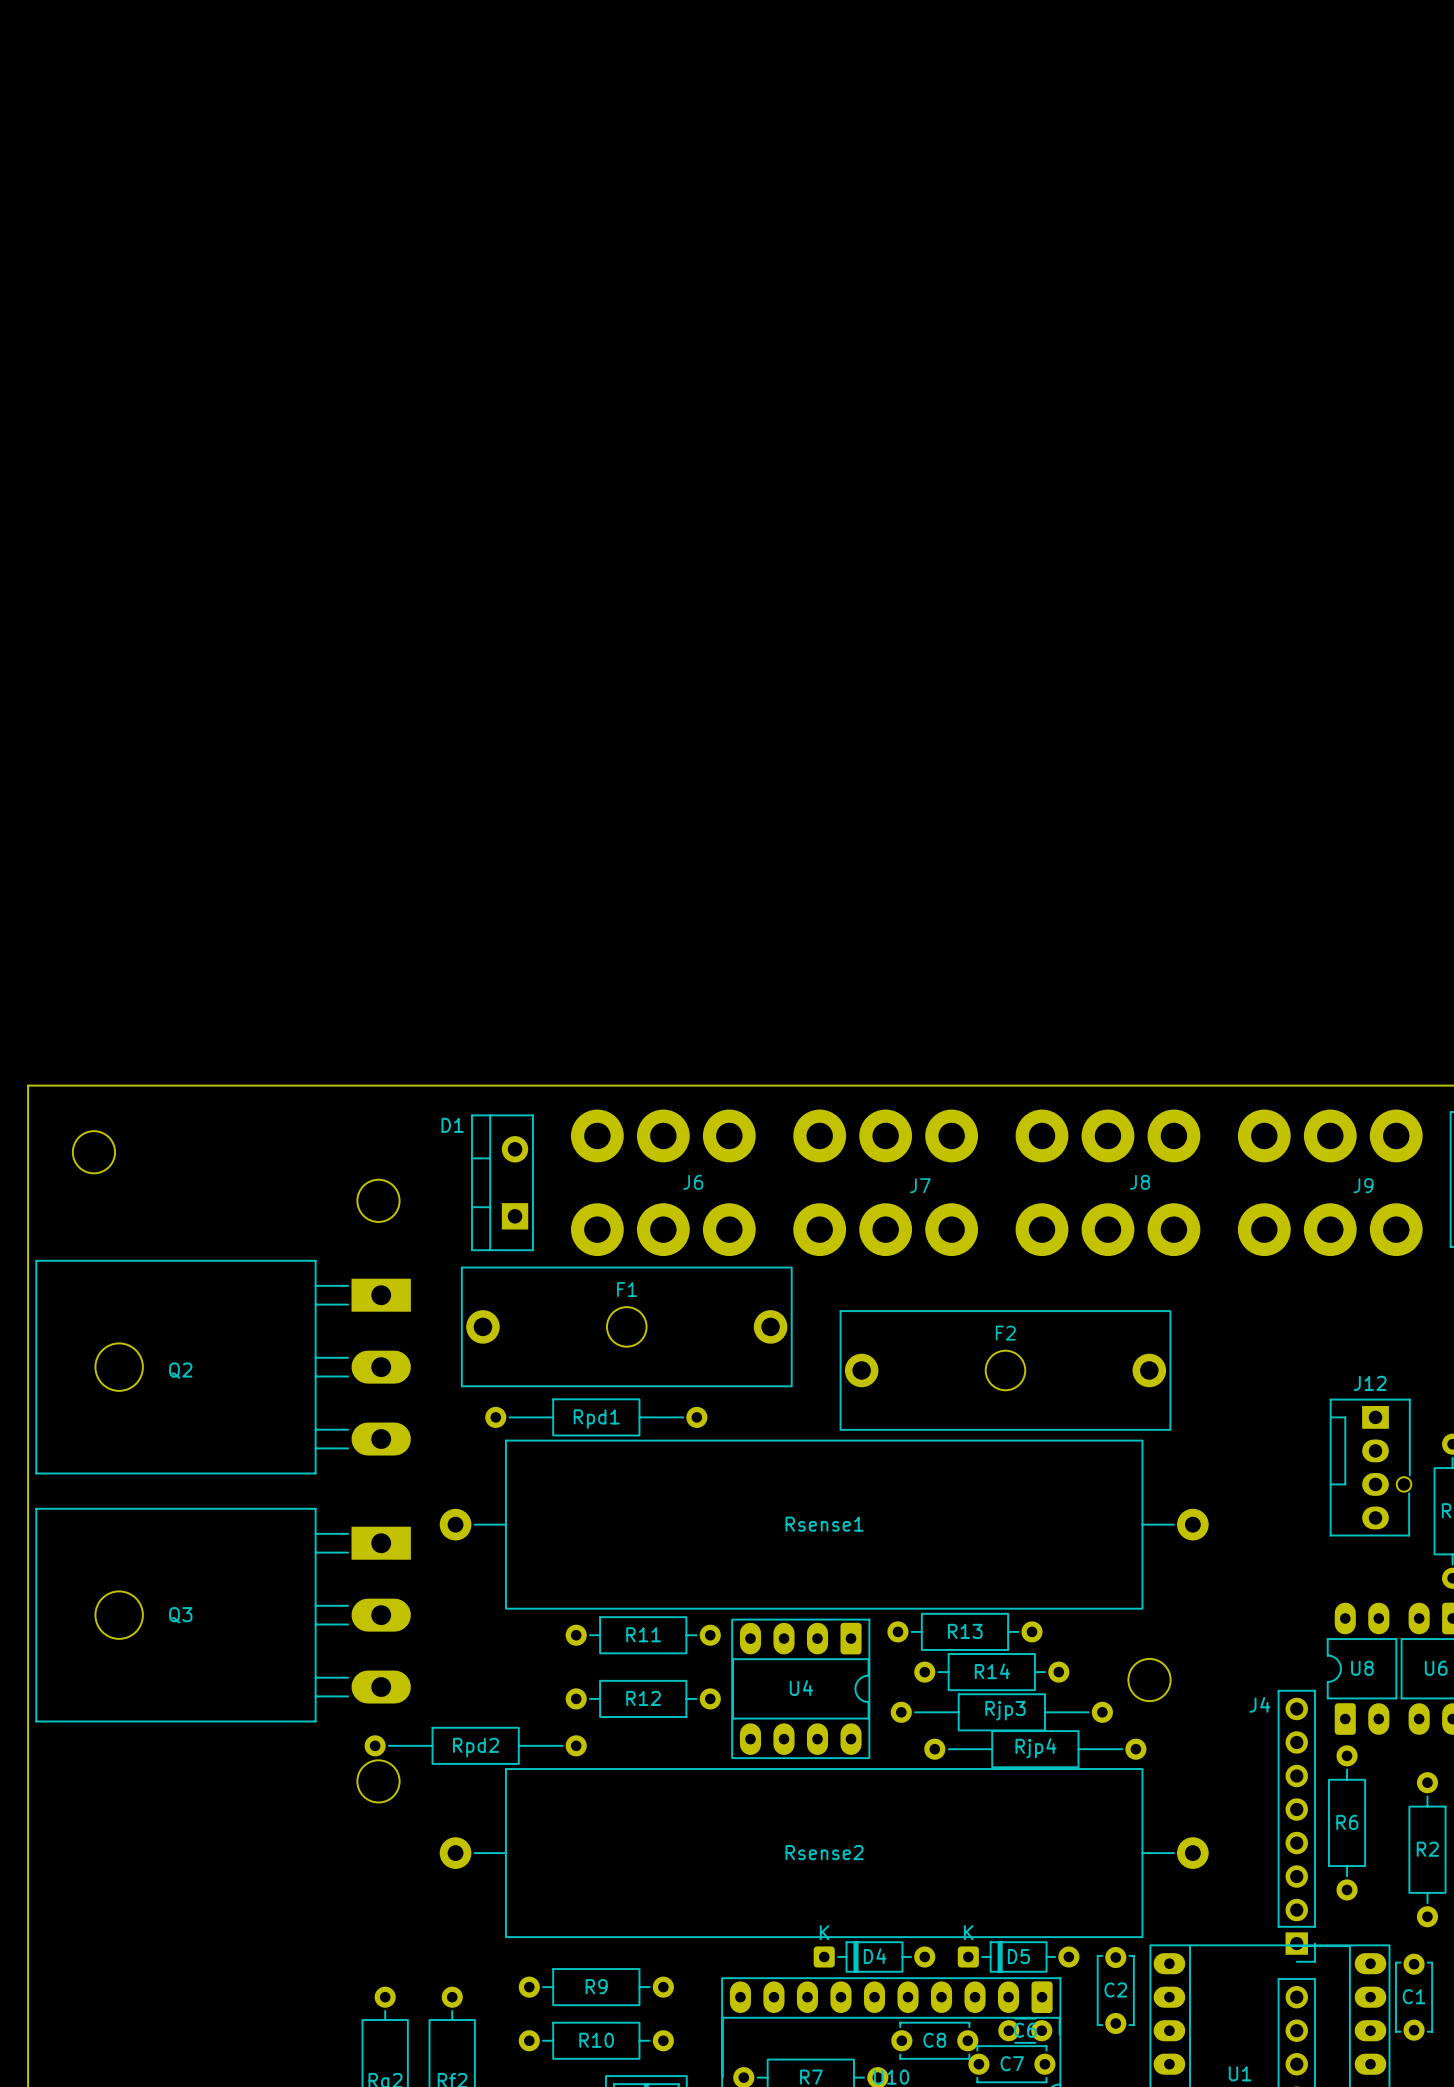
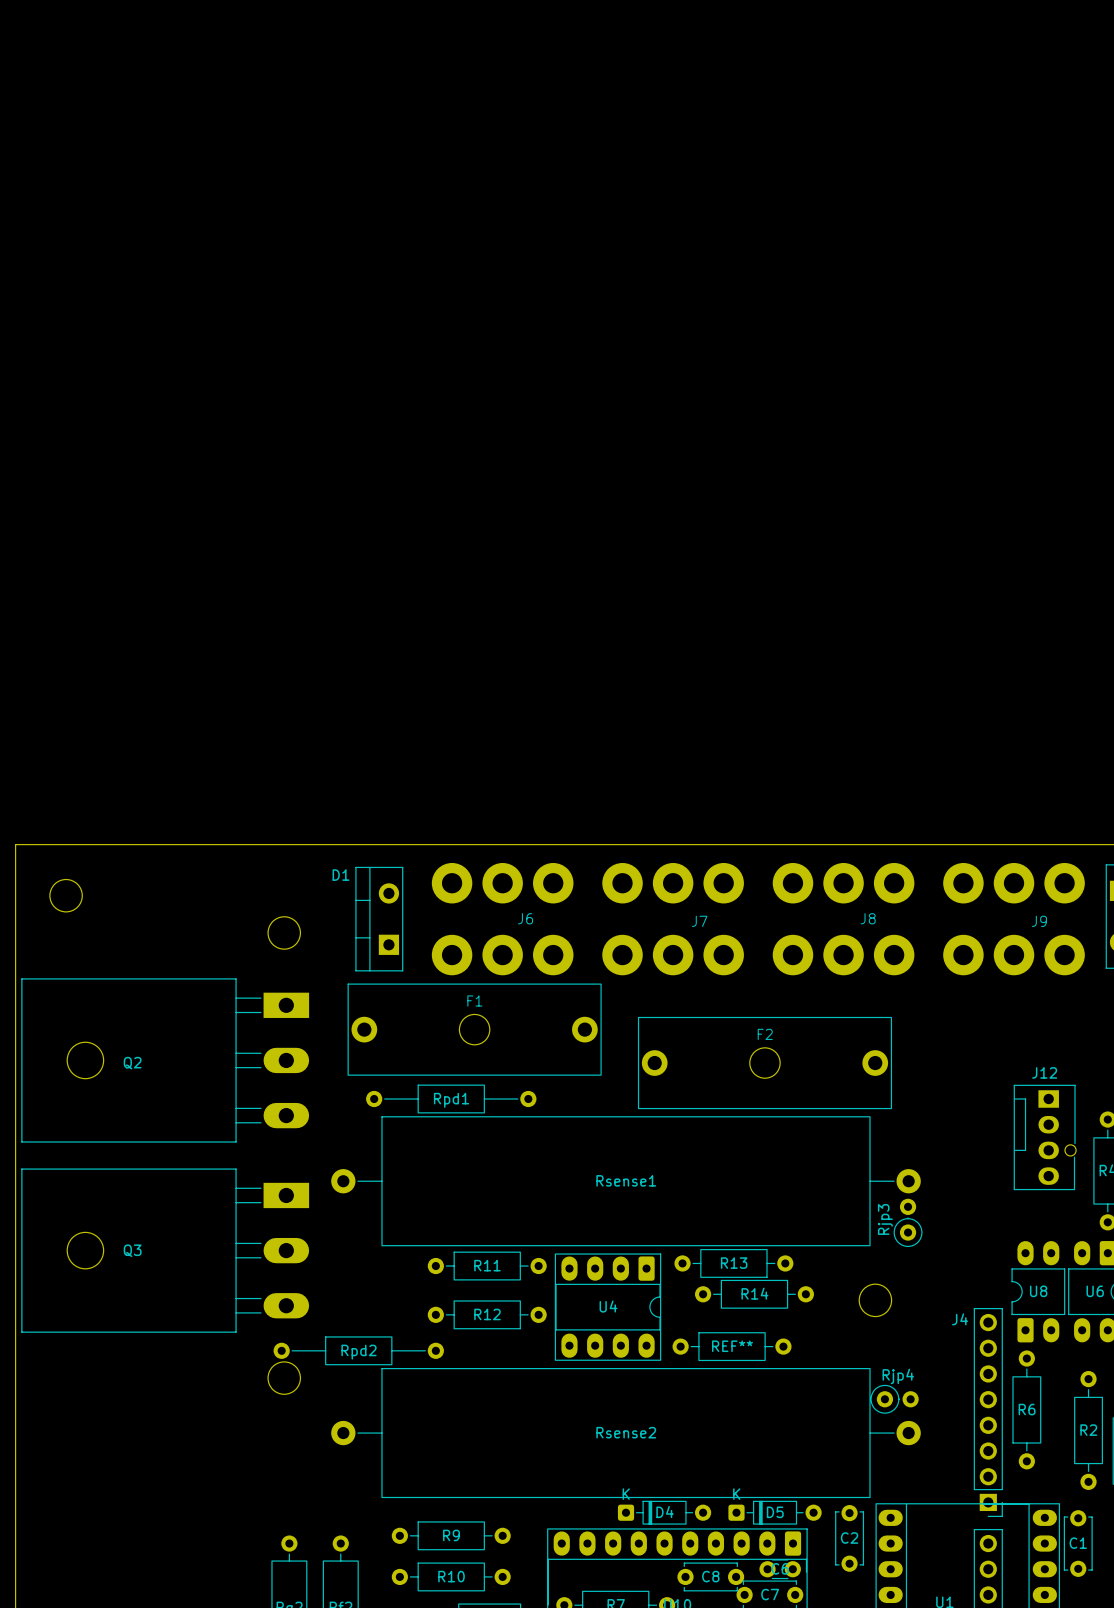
Rjp3 footprint: [890, 1693, 1113, 1732] -> [893, 1198, 923, 1248]
Rjp3 name position: Rjp3 (1005, 1710) -> Rjp3 (885, 1219)
Rjp4 footprint: [924, 1730, 1147, 1769] -> [870, 1384, 919, 1414]
REF**: none -> (732, 1346)
Rjp4 name position: Rjp4 (1035, 1748) -> Rjp4 (898, 1376)

